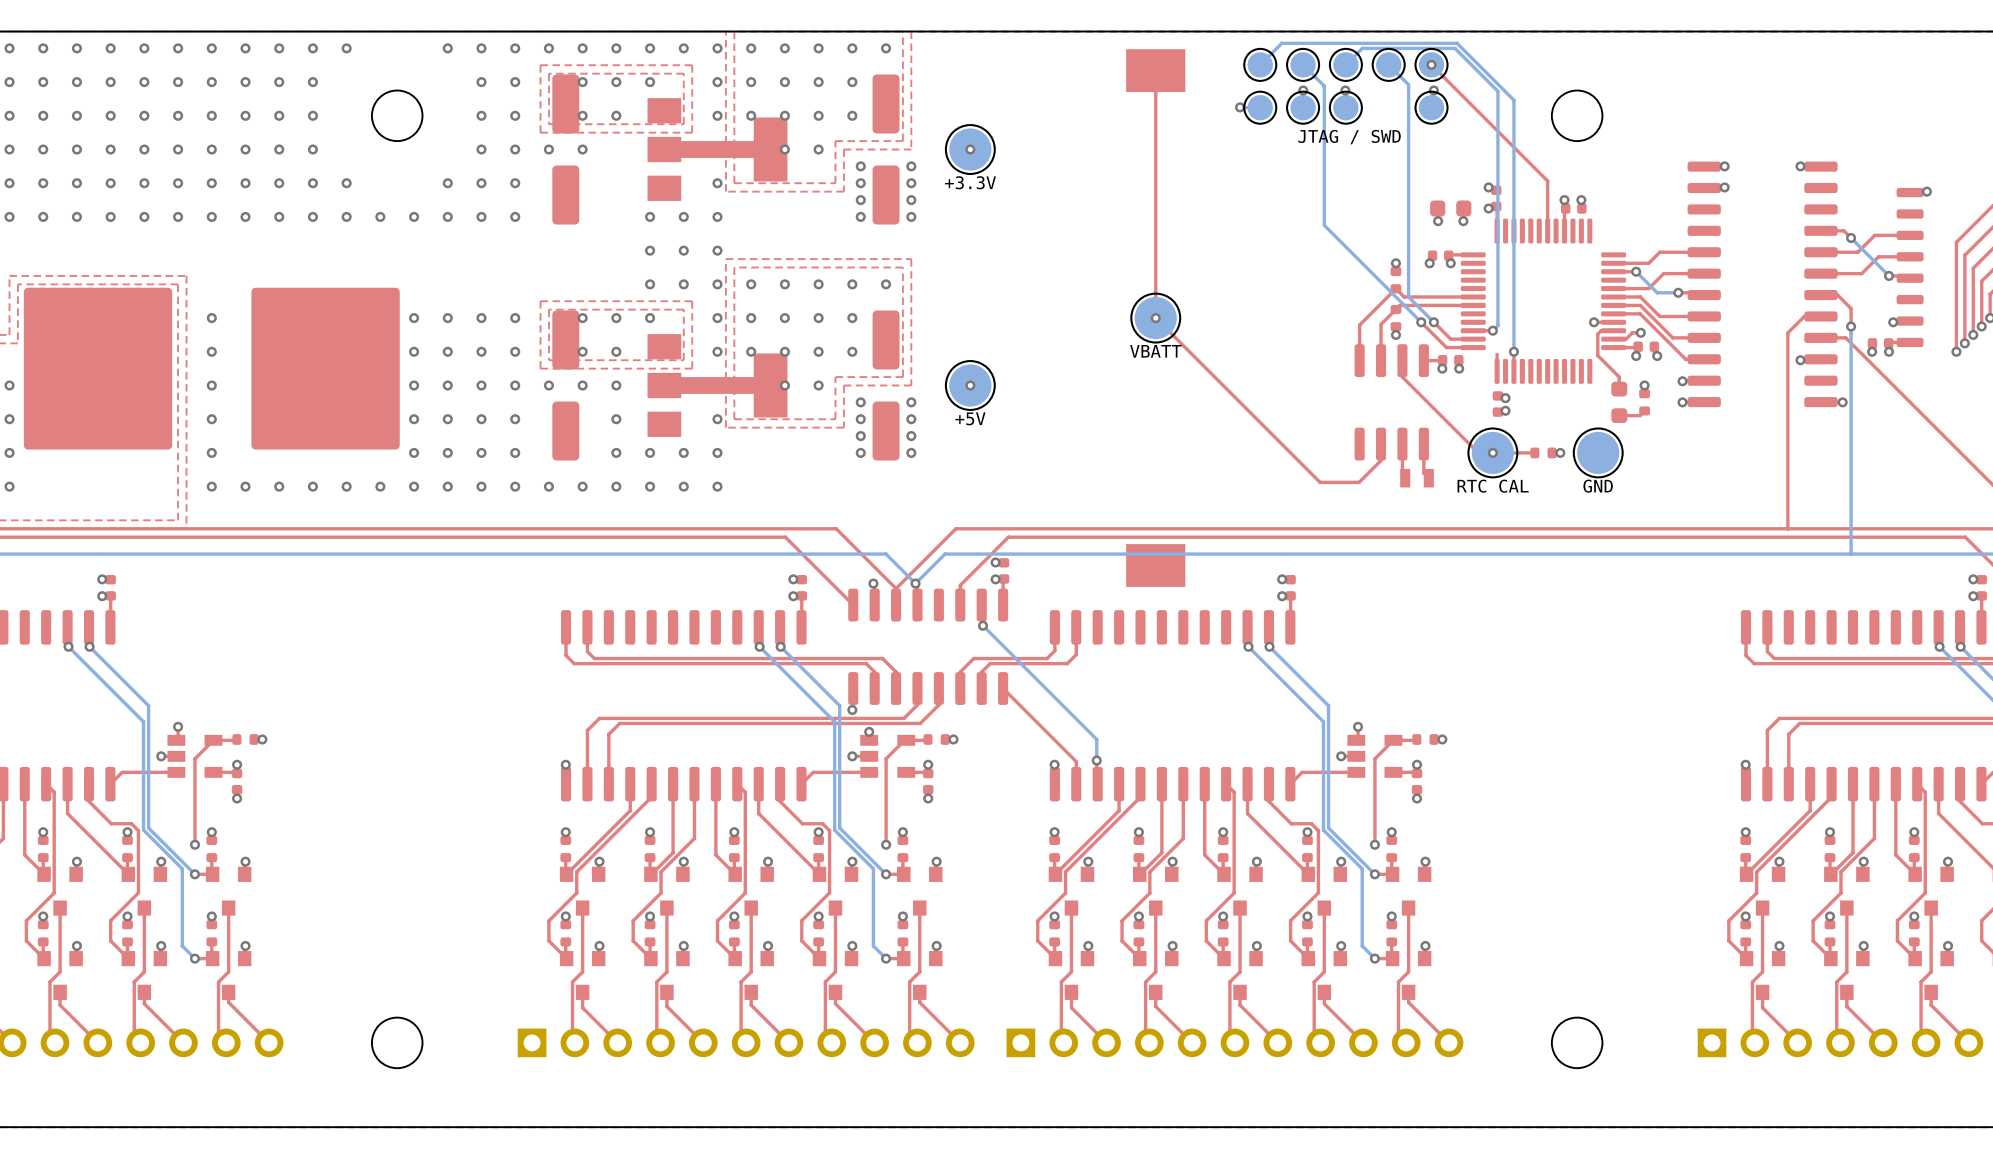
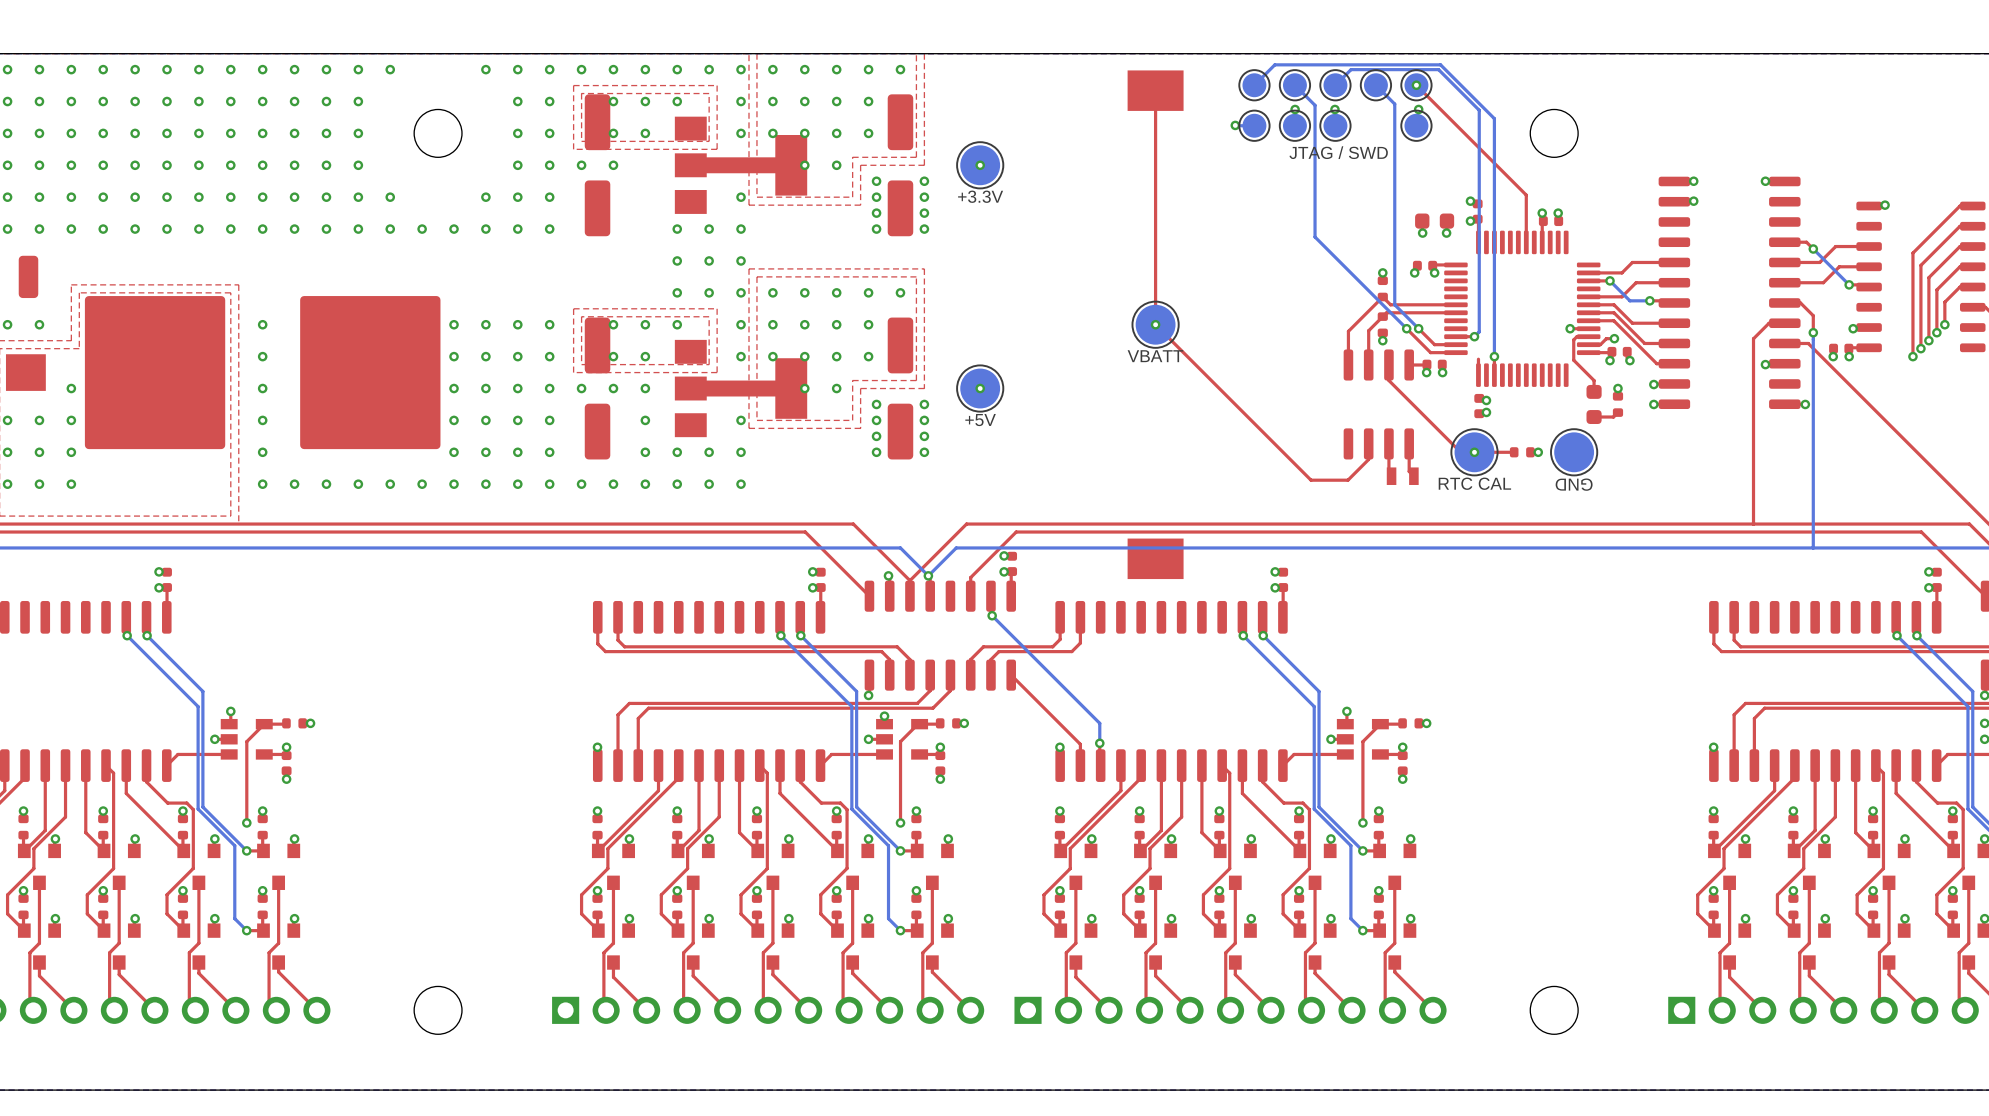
text rotation: 0° (1598, 486) -> 180° (1574, 484)

